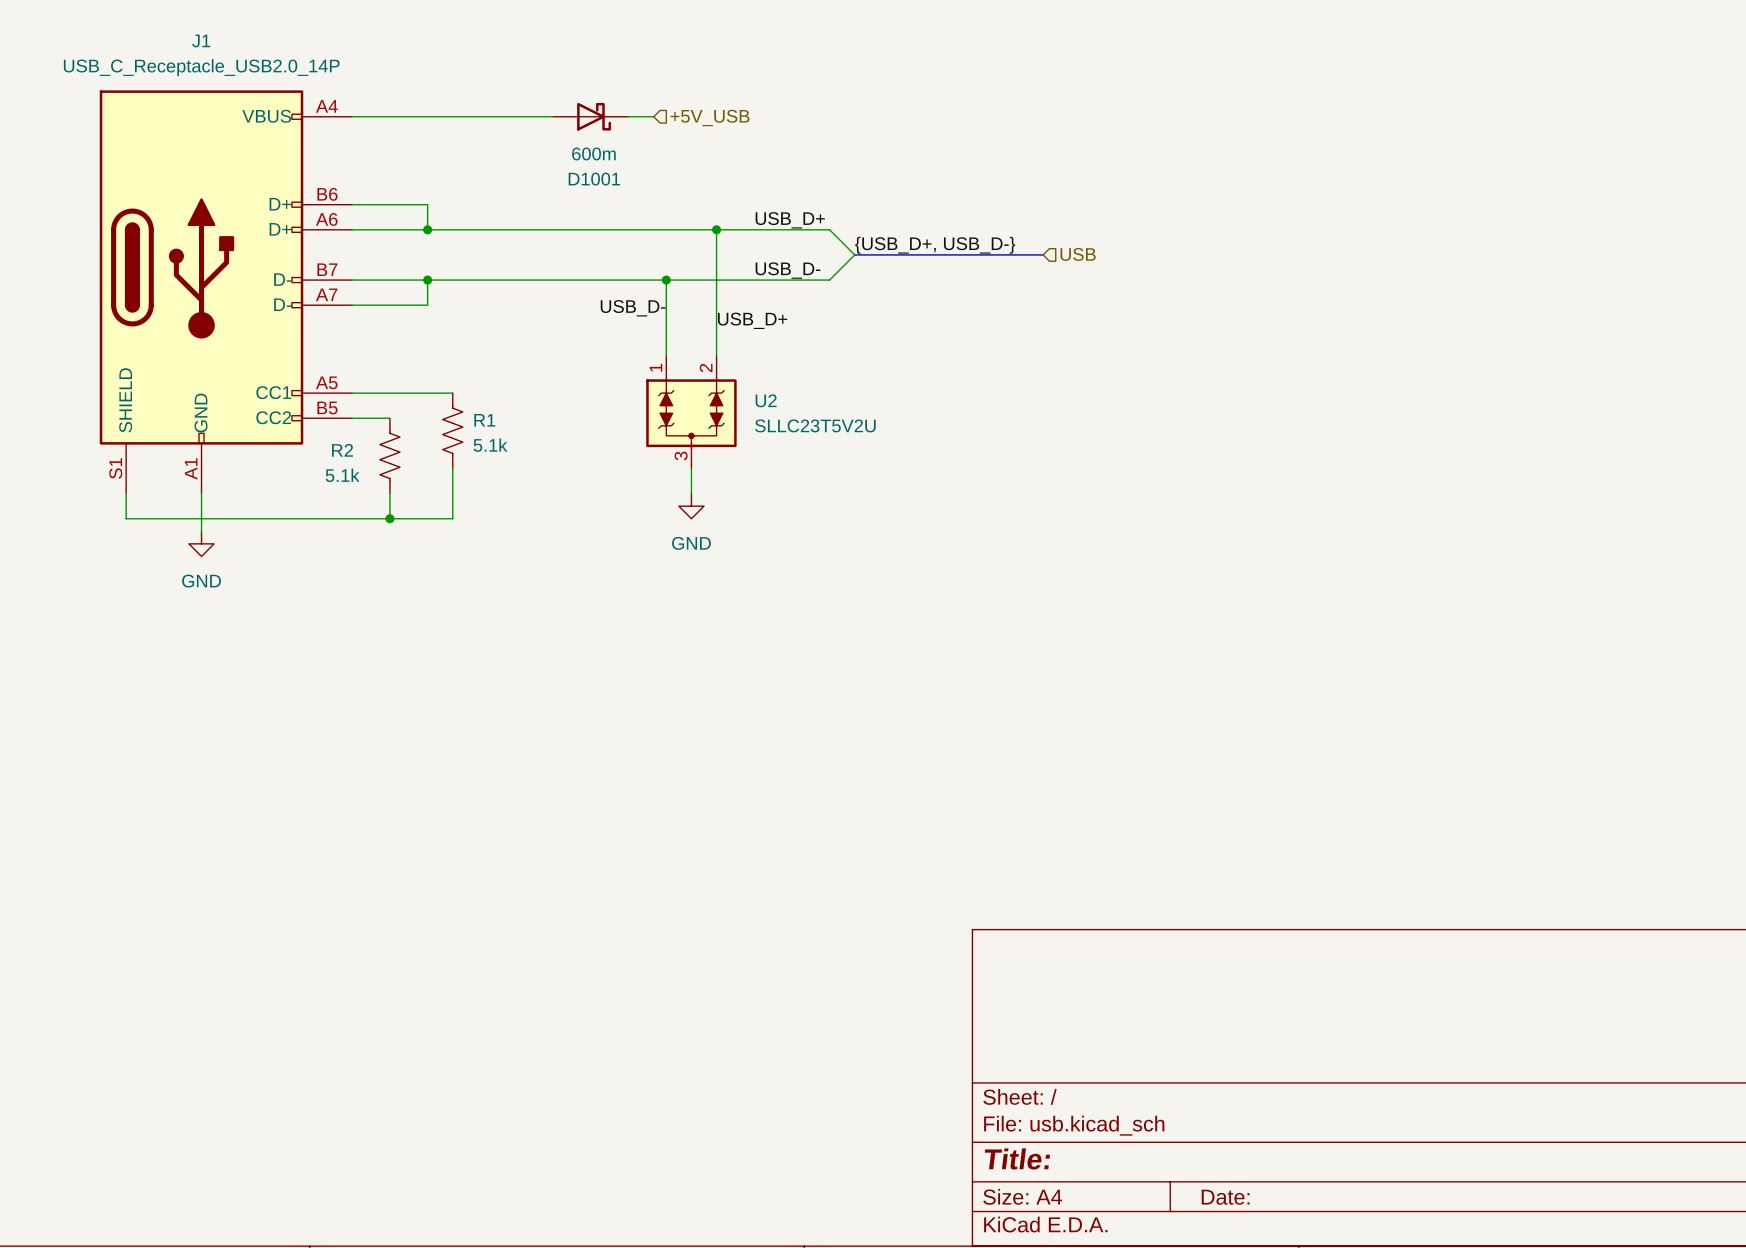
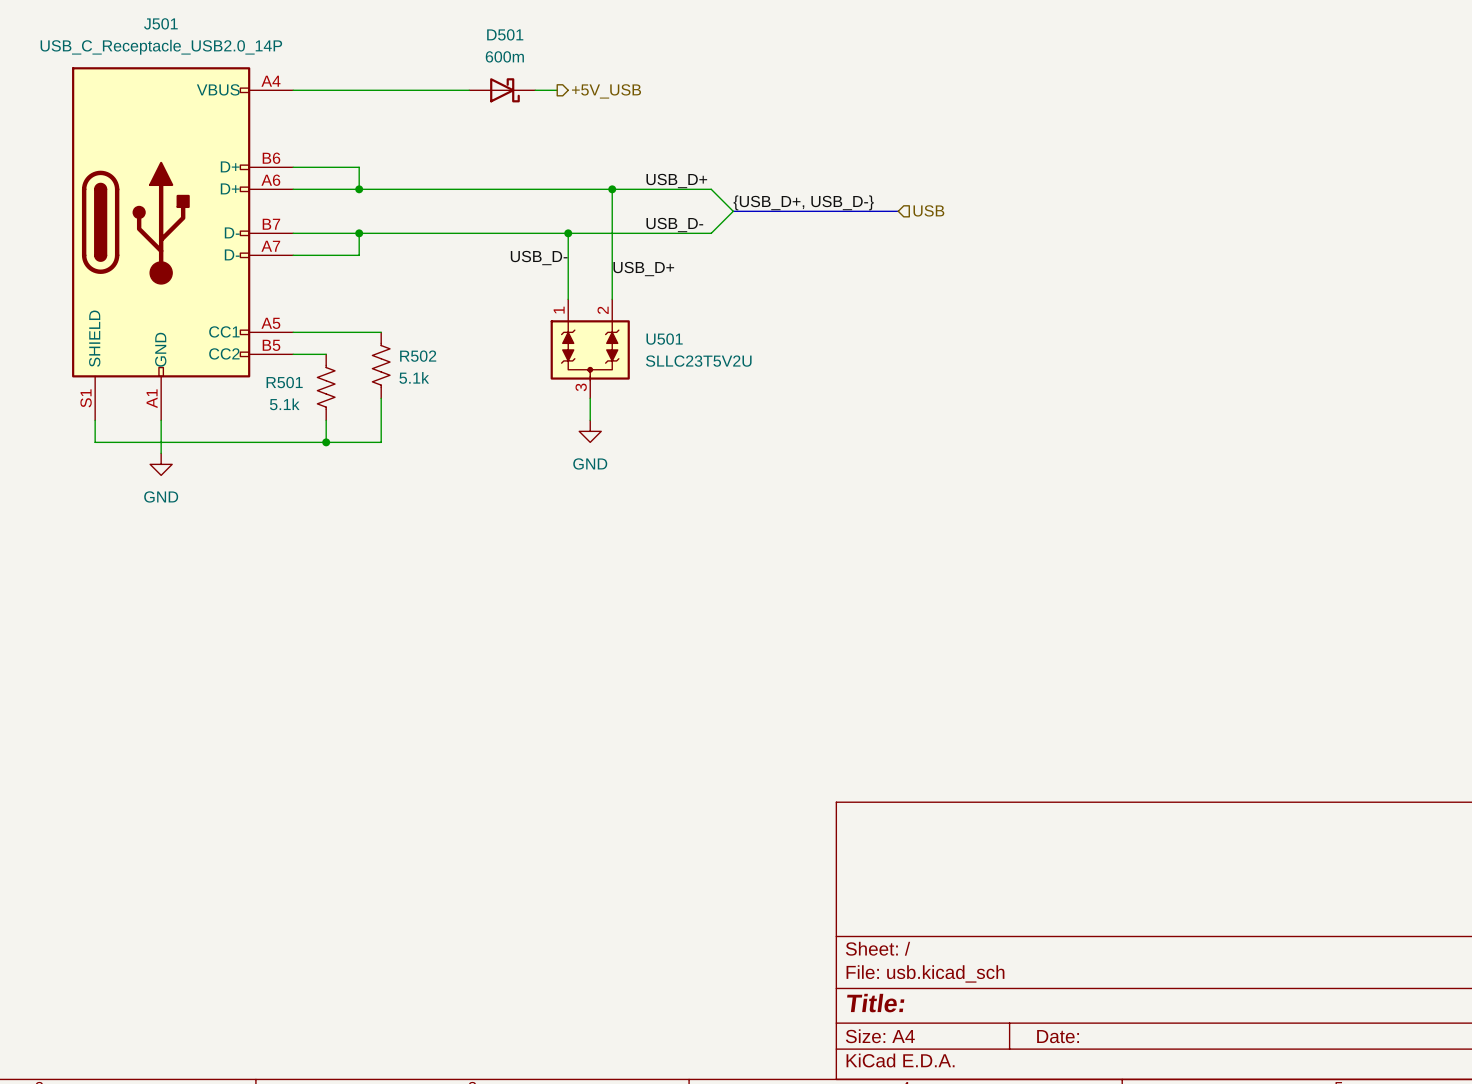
J1 name: J1 (201, 41) -> J501 (160, 23)
hierarchical label shape: input (710, 118) -> output (606, 91)
D1001 value position: 600m (593, 153) -> 600m (504, 56)
D1001 name: D1001 (594, 179) -> D501 (505, 34)
U2 name: U2 (766, 400) -> U501 (664, 339)
R1 name: R1 (484, 420) -> R502 (418, 356)
R2 name: R2 (342, 450) -> R501 (284, 382)

